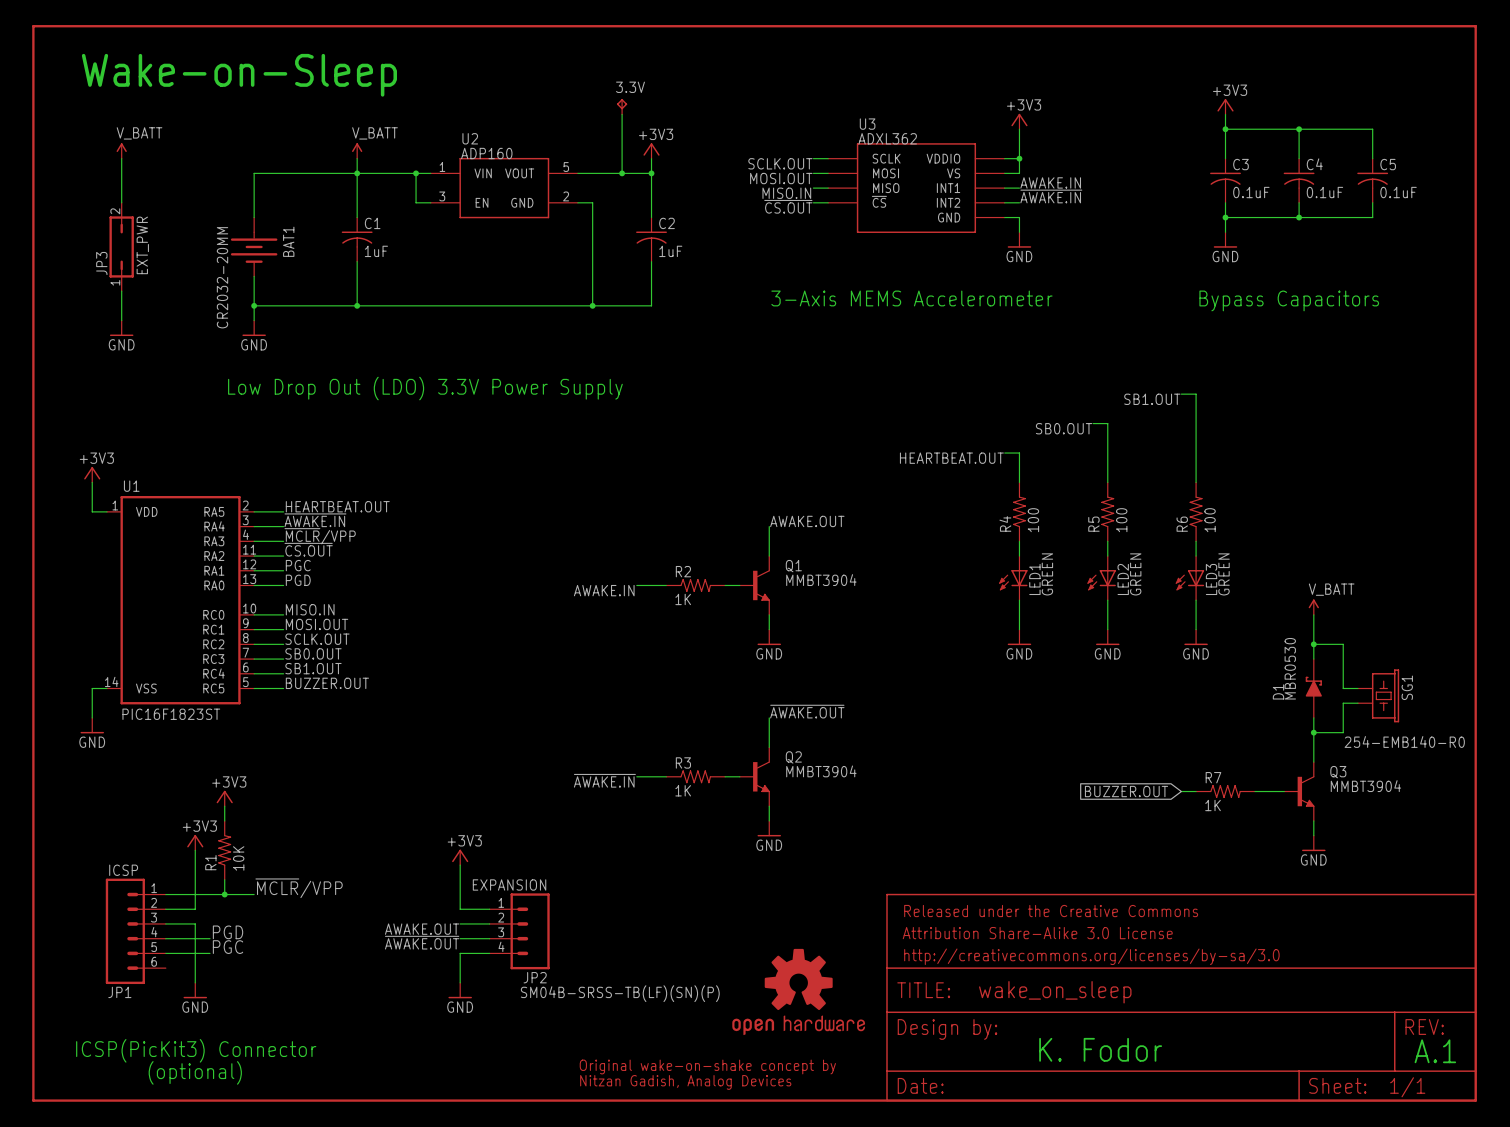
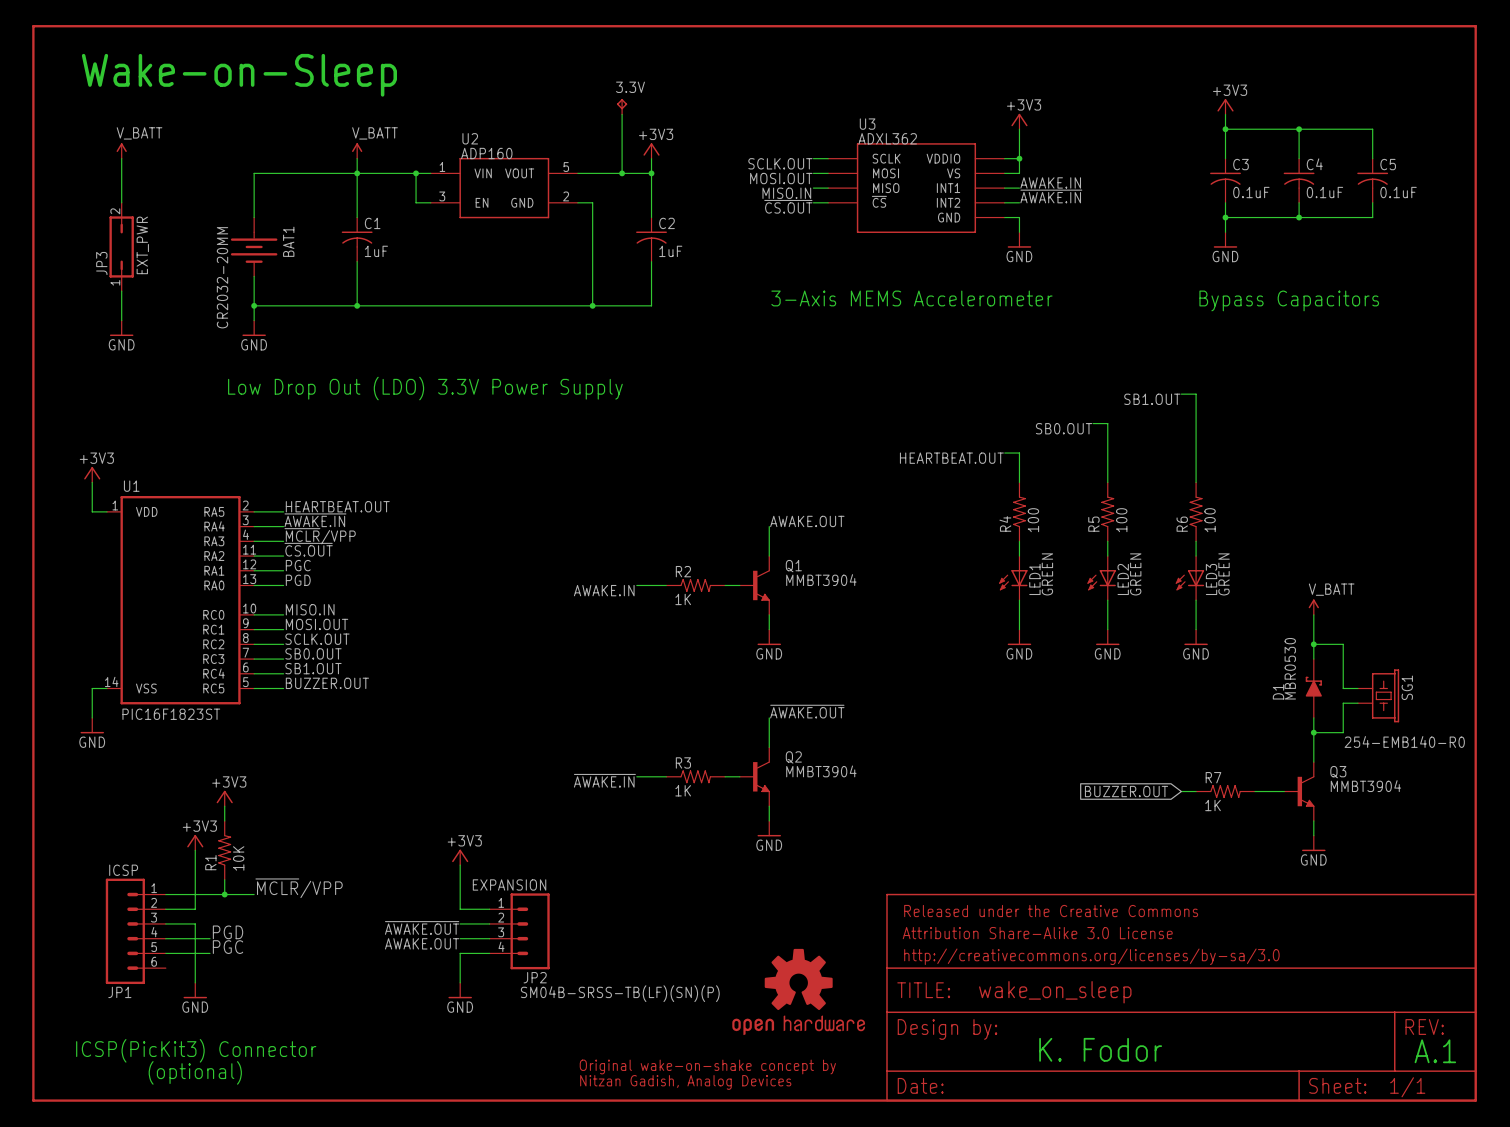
label: AWAKE.OUT (422, 929) -> ~{AWAKE.OUT} (422, 927)
label: ~{AWAKE.OUT} (422, 942) -> AWAKE.OUT (422, 943)

